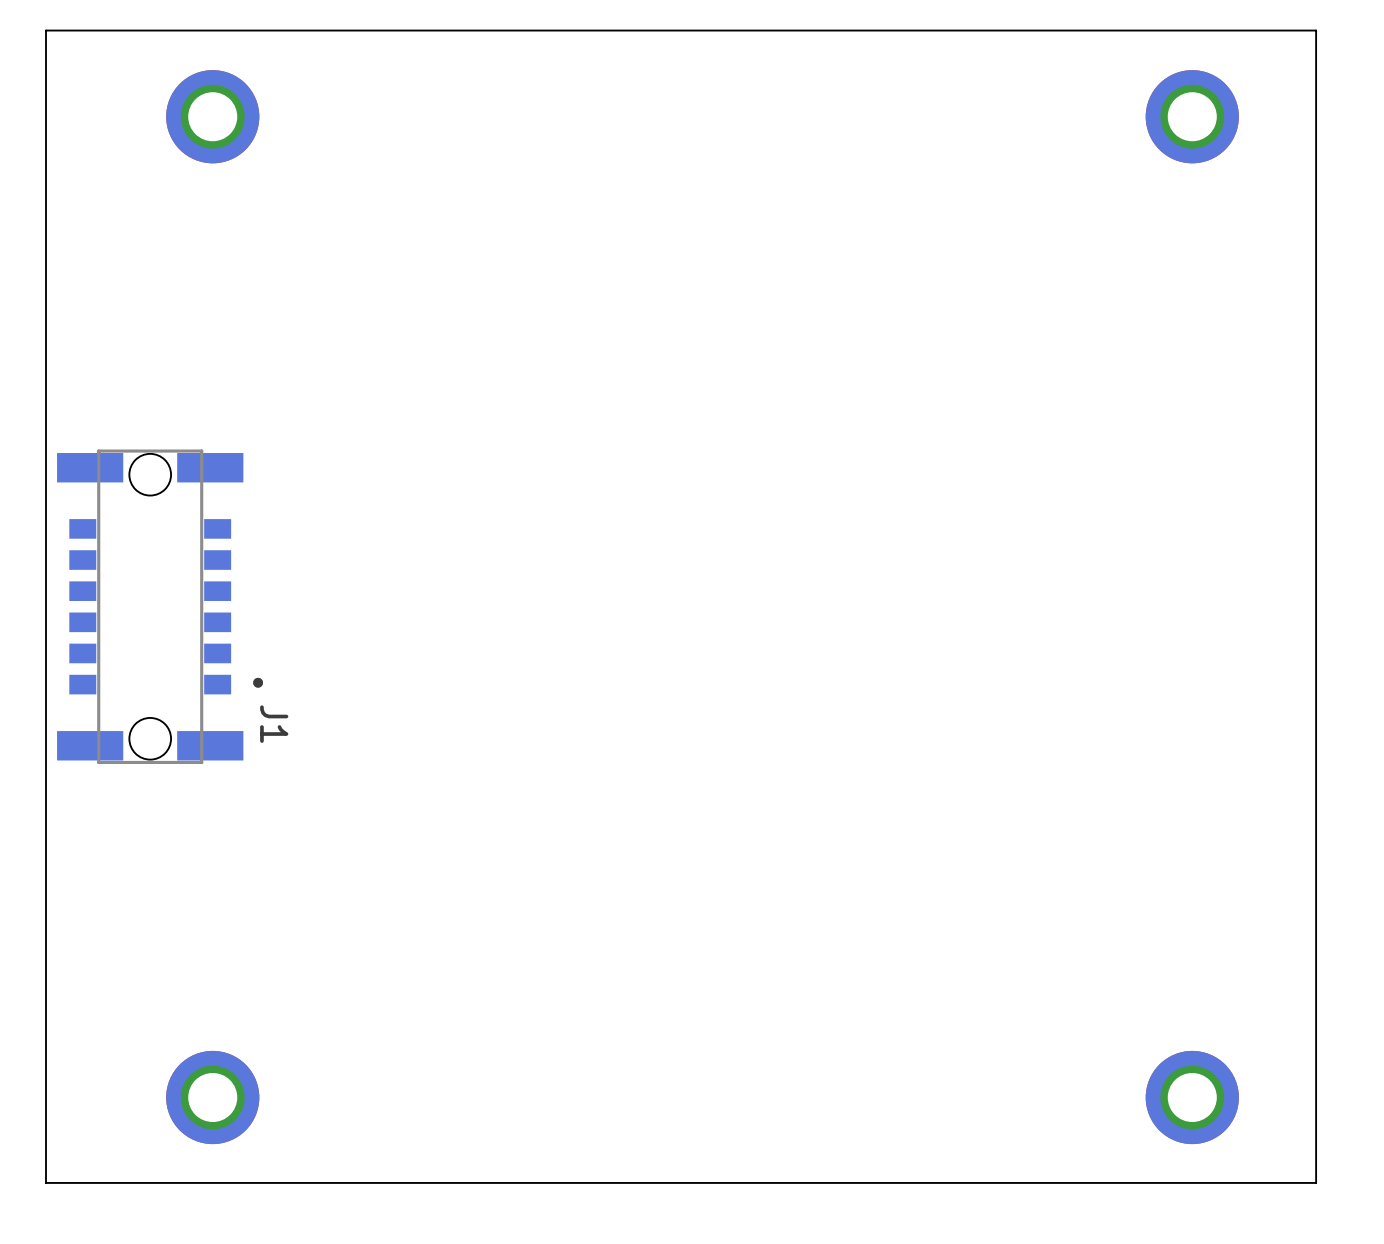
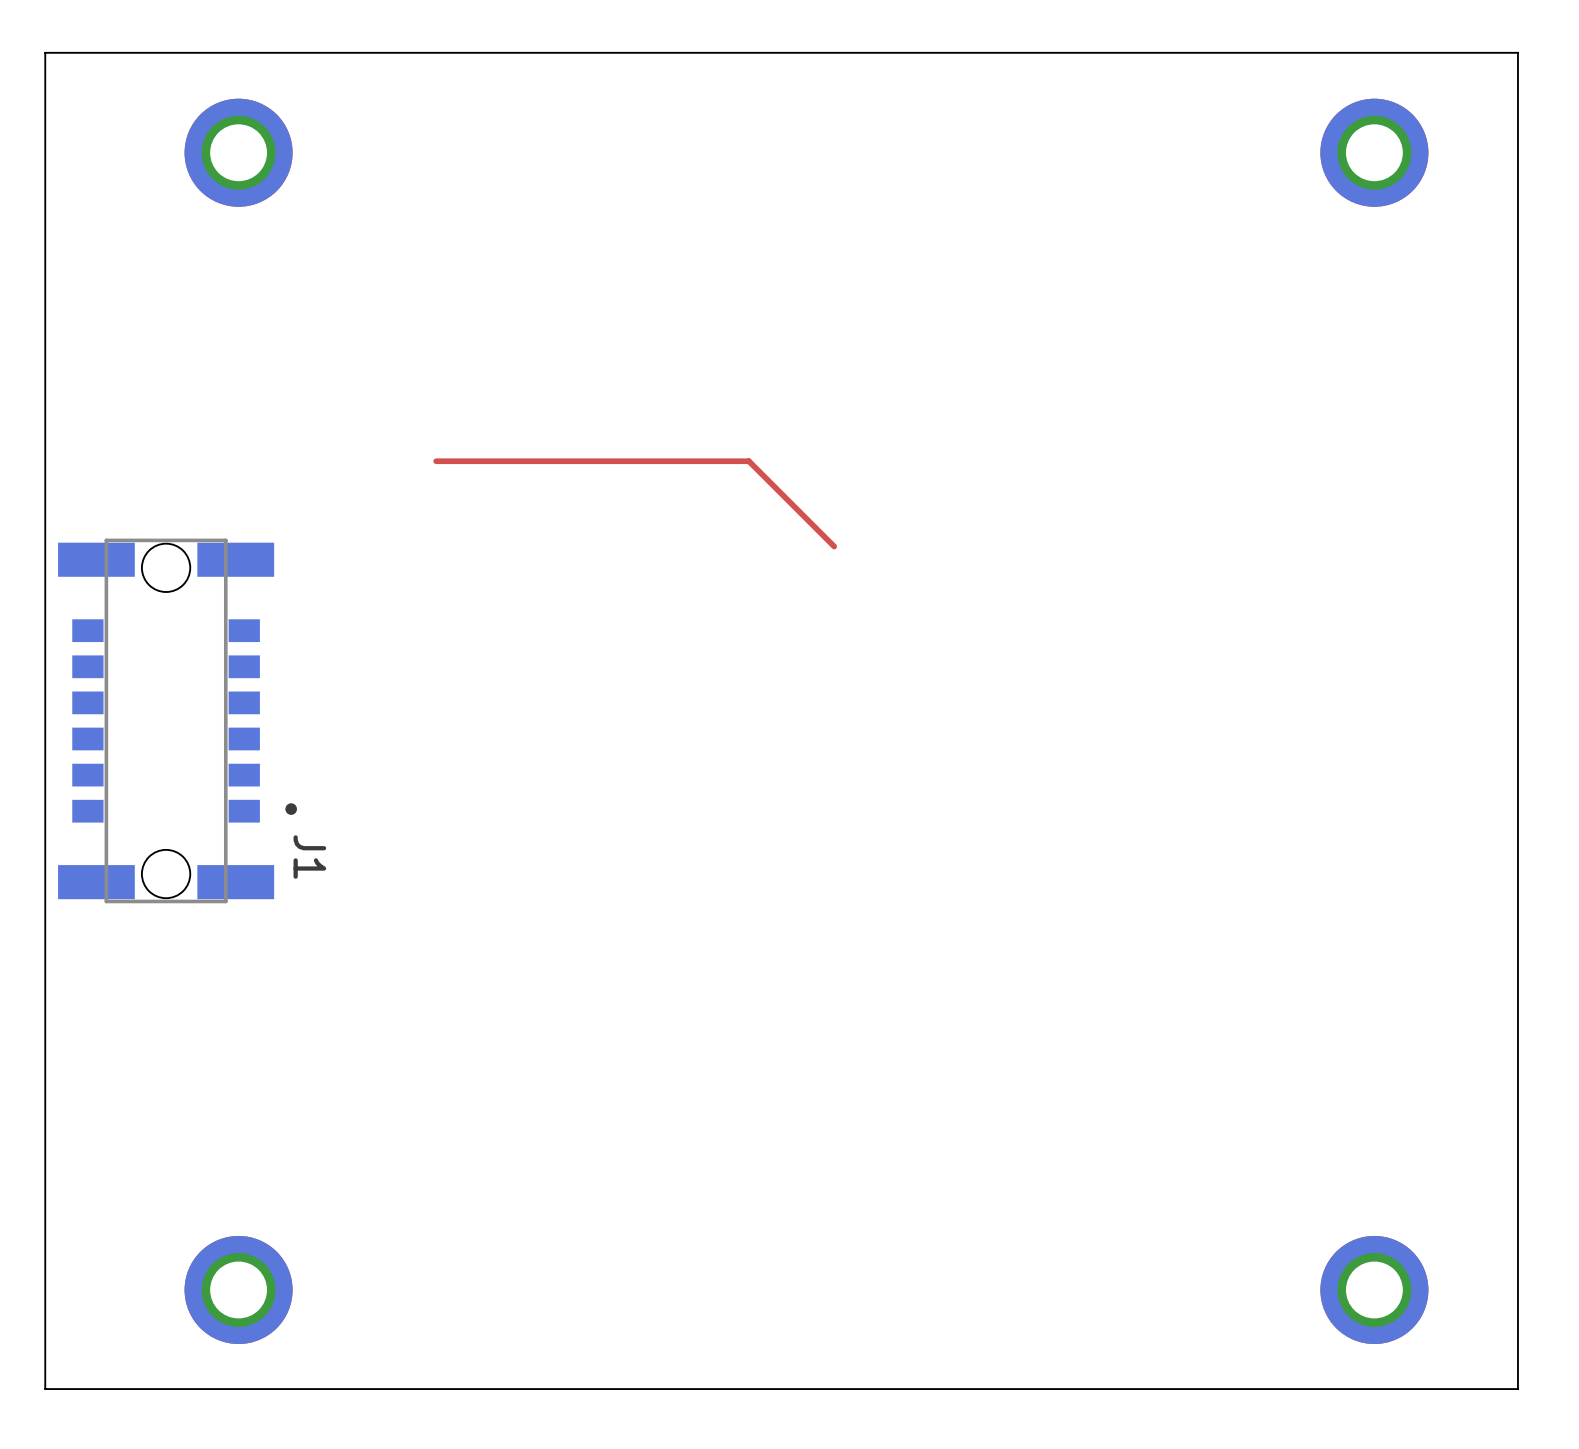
top track: none -> (436, 461) (748, 461) (834, 546)

